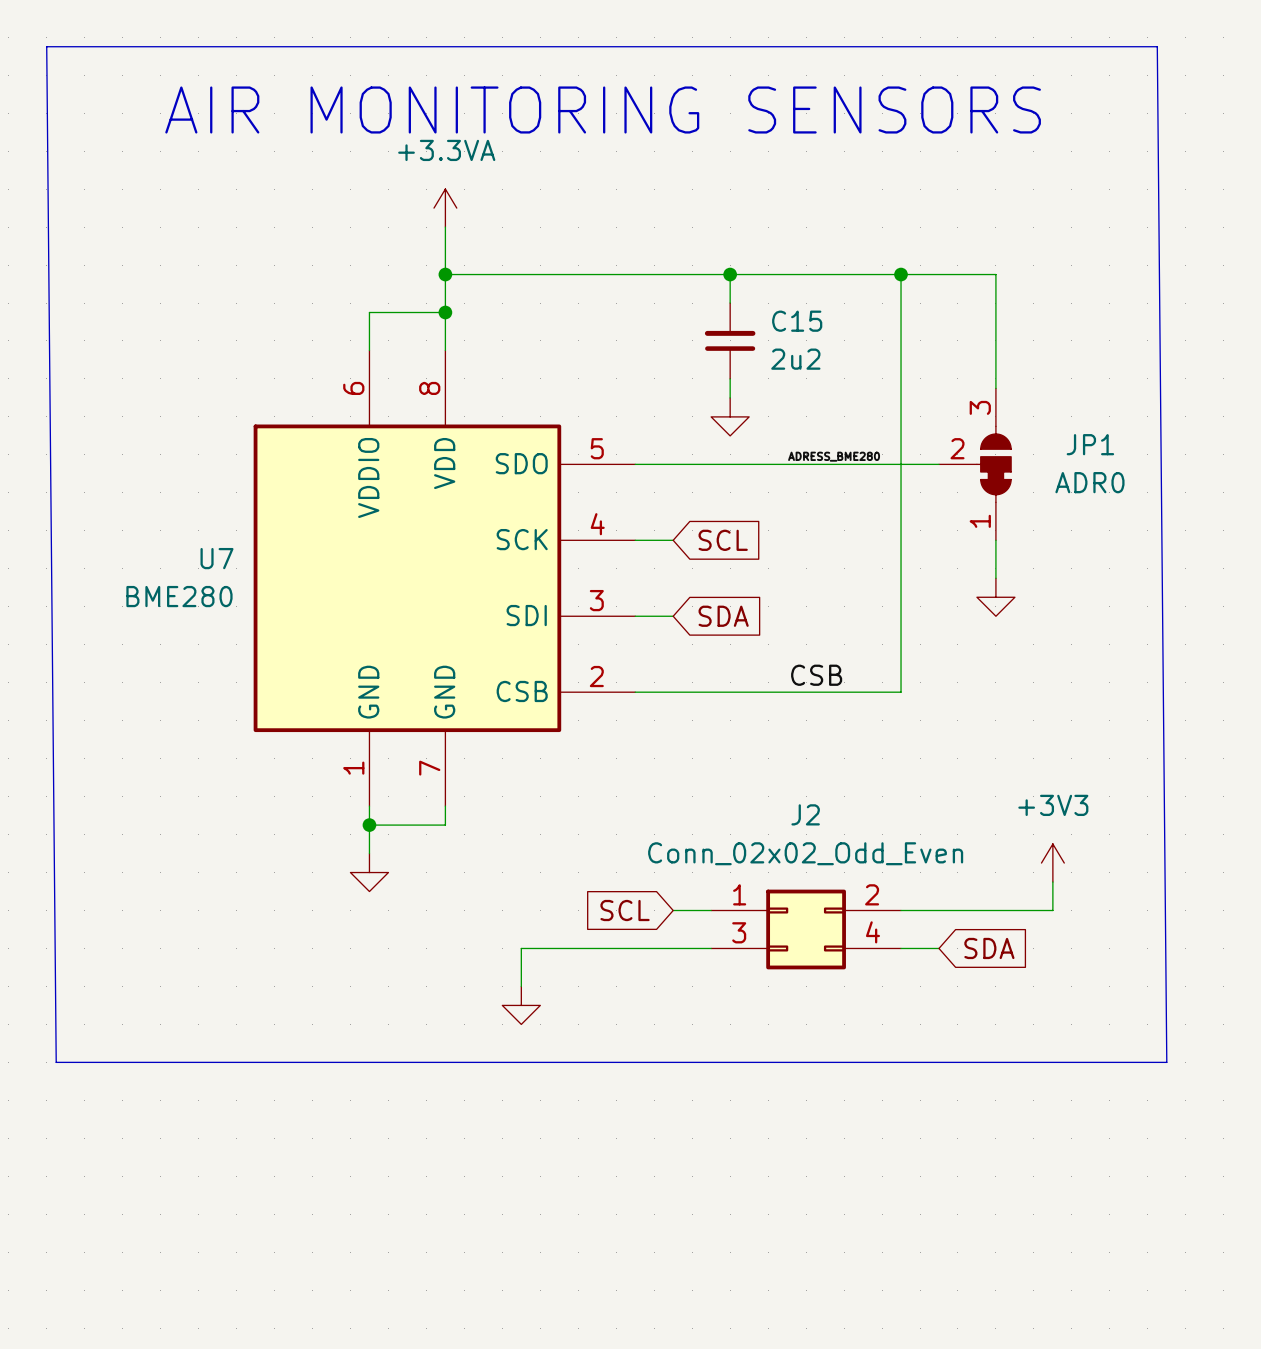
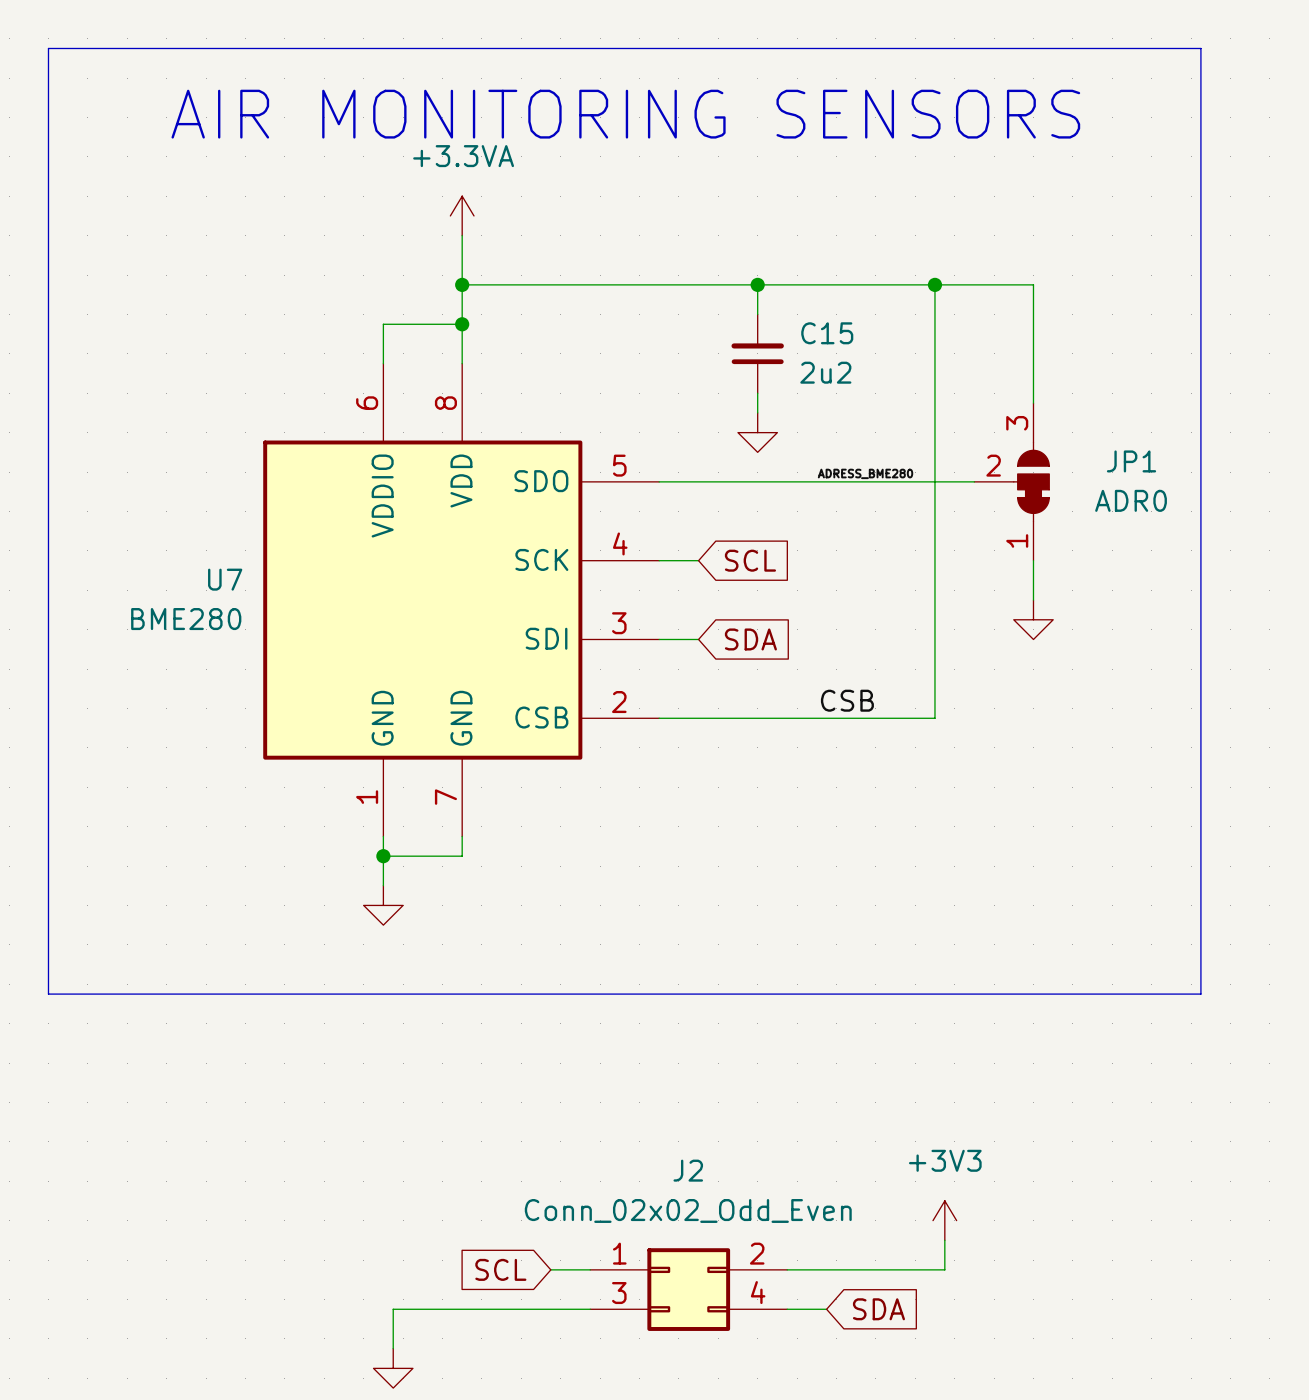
line: (46, 46) (56, 1062) (1166, 1062) (1157, 46) -> (48, 48) (48, 994) (1200, 994) (1200, 48)
power symbol position: +3V3 (1052, 863) -> +3V3 (944, 1220)
wire: (1052, 882) (1052, 910) (901, 910) -> (944, 1240) (944, 1269) (787, 1269)
global label position: SCL (625, 910) -> SCL (500, 1269)
wire: (673, 910) (711, 910) -> (550, 1269) (590, 1269)
J2 position: (806, 929) -> (688, 1289)
wire: (711, 948) (521, 948) (521, 986) -> (590, 1309) (393, 1309) (393, 1348)
wire: (901, 948) (938, 948) -> (787, 1309) (826, 1309)
global label position: SDA (989, 948) -> SDA (878, 1309)
power symbol position: (521, 1005) -> (393, 1368)

